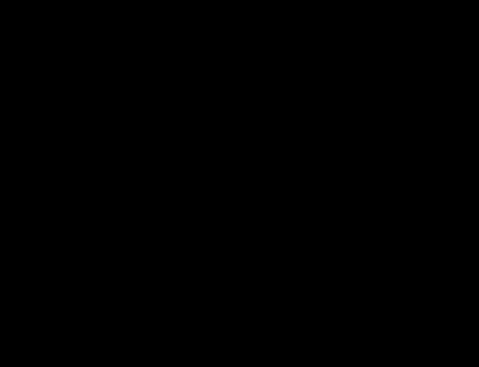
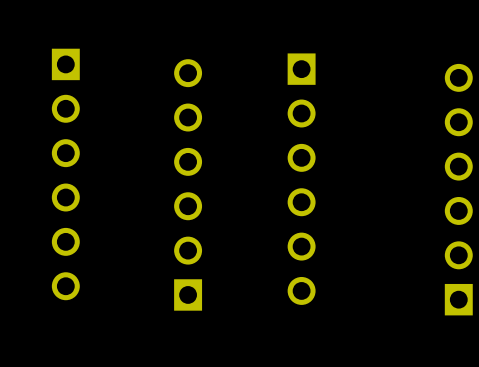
part: none -> (65, 174)
part: none -> (301, 179)
part: none -> (188, 184)
part: none -> (458, 189)

